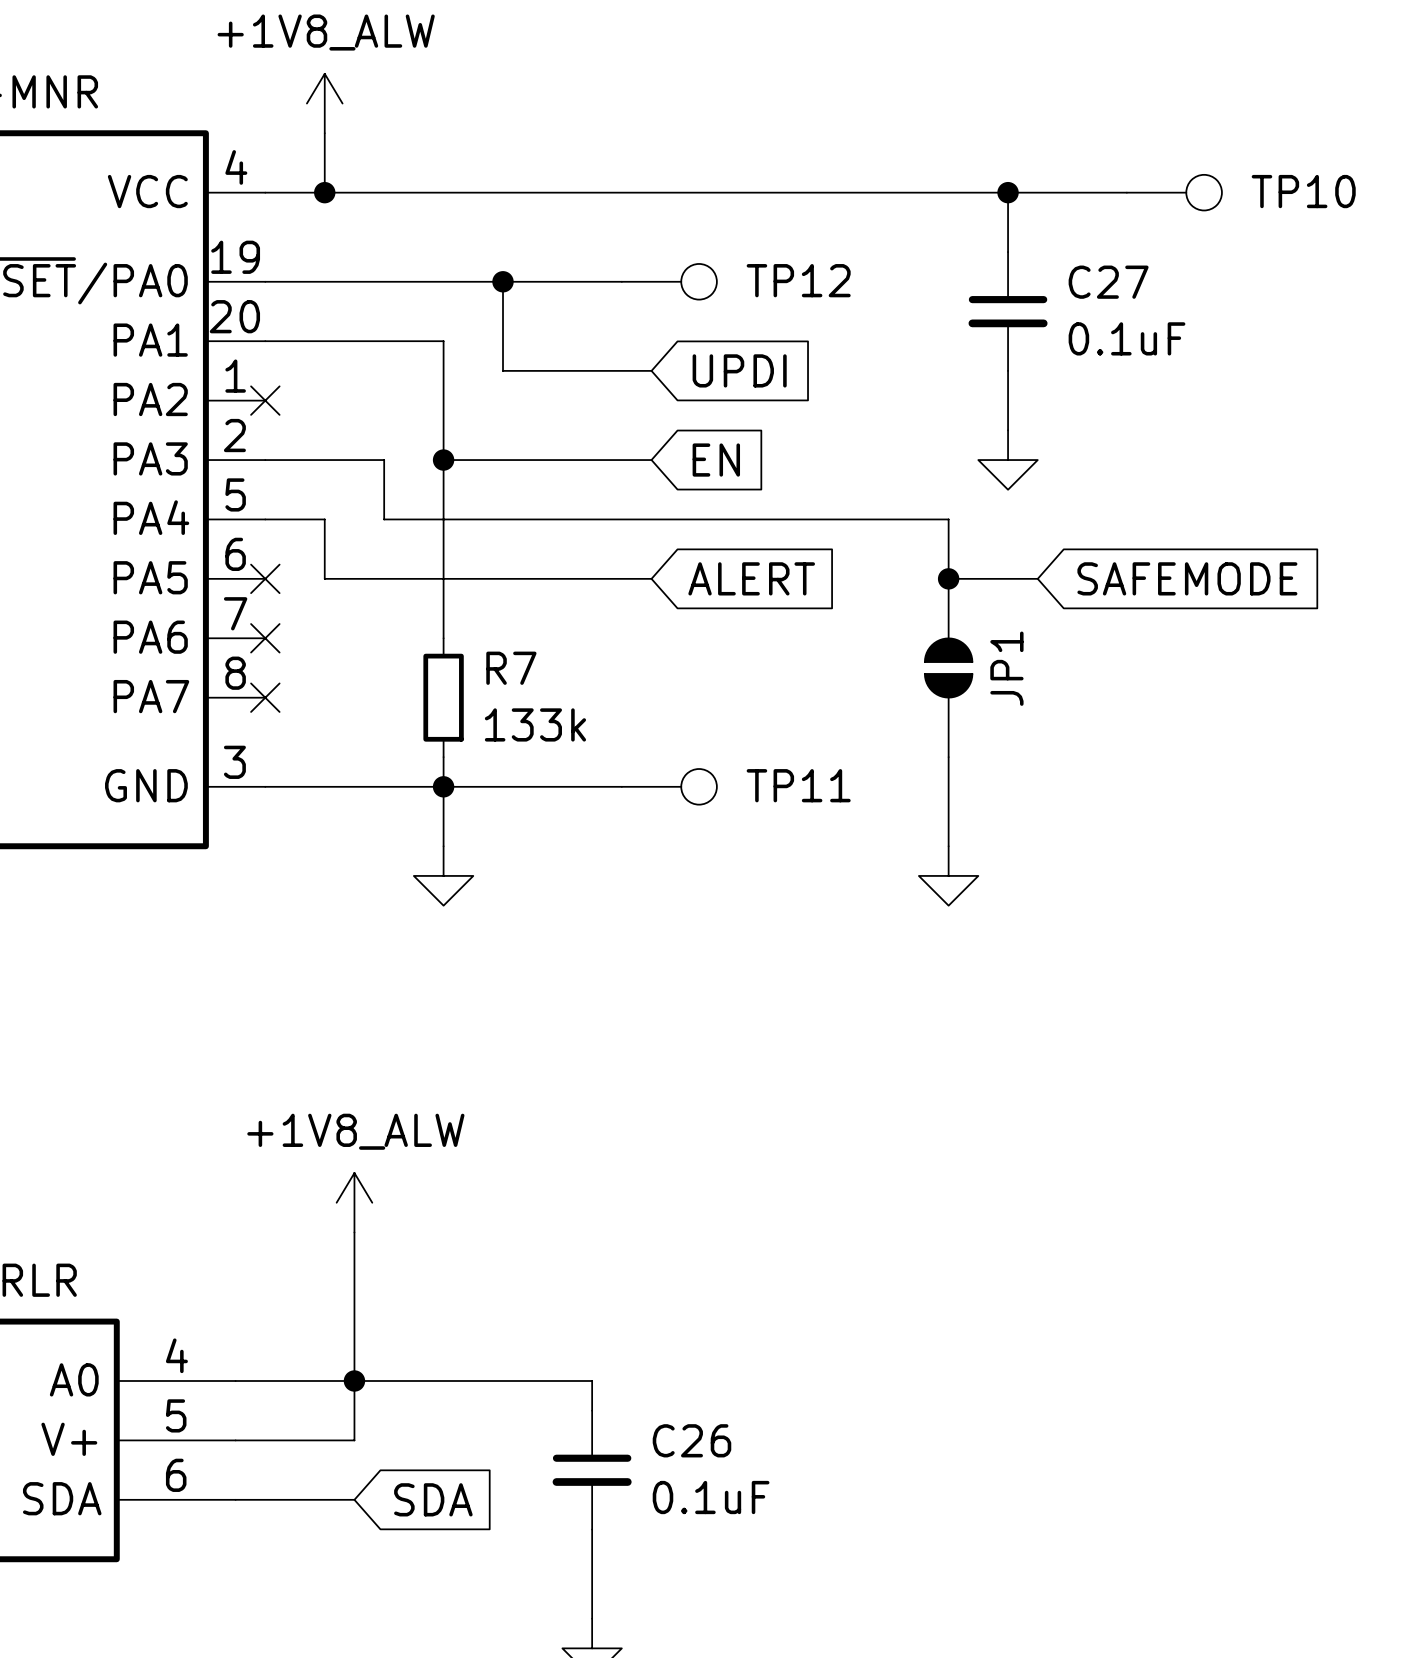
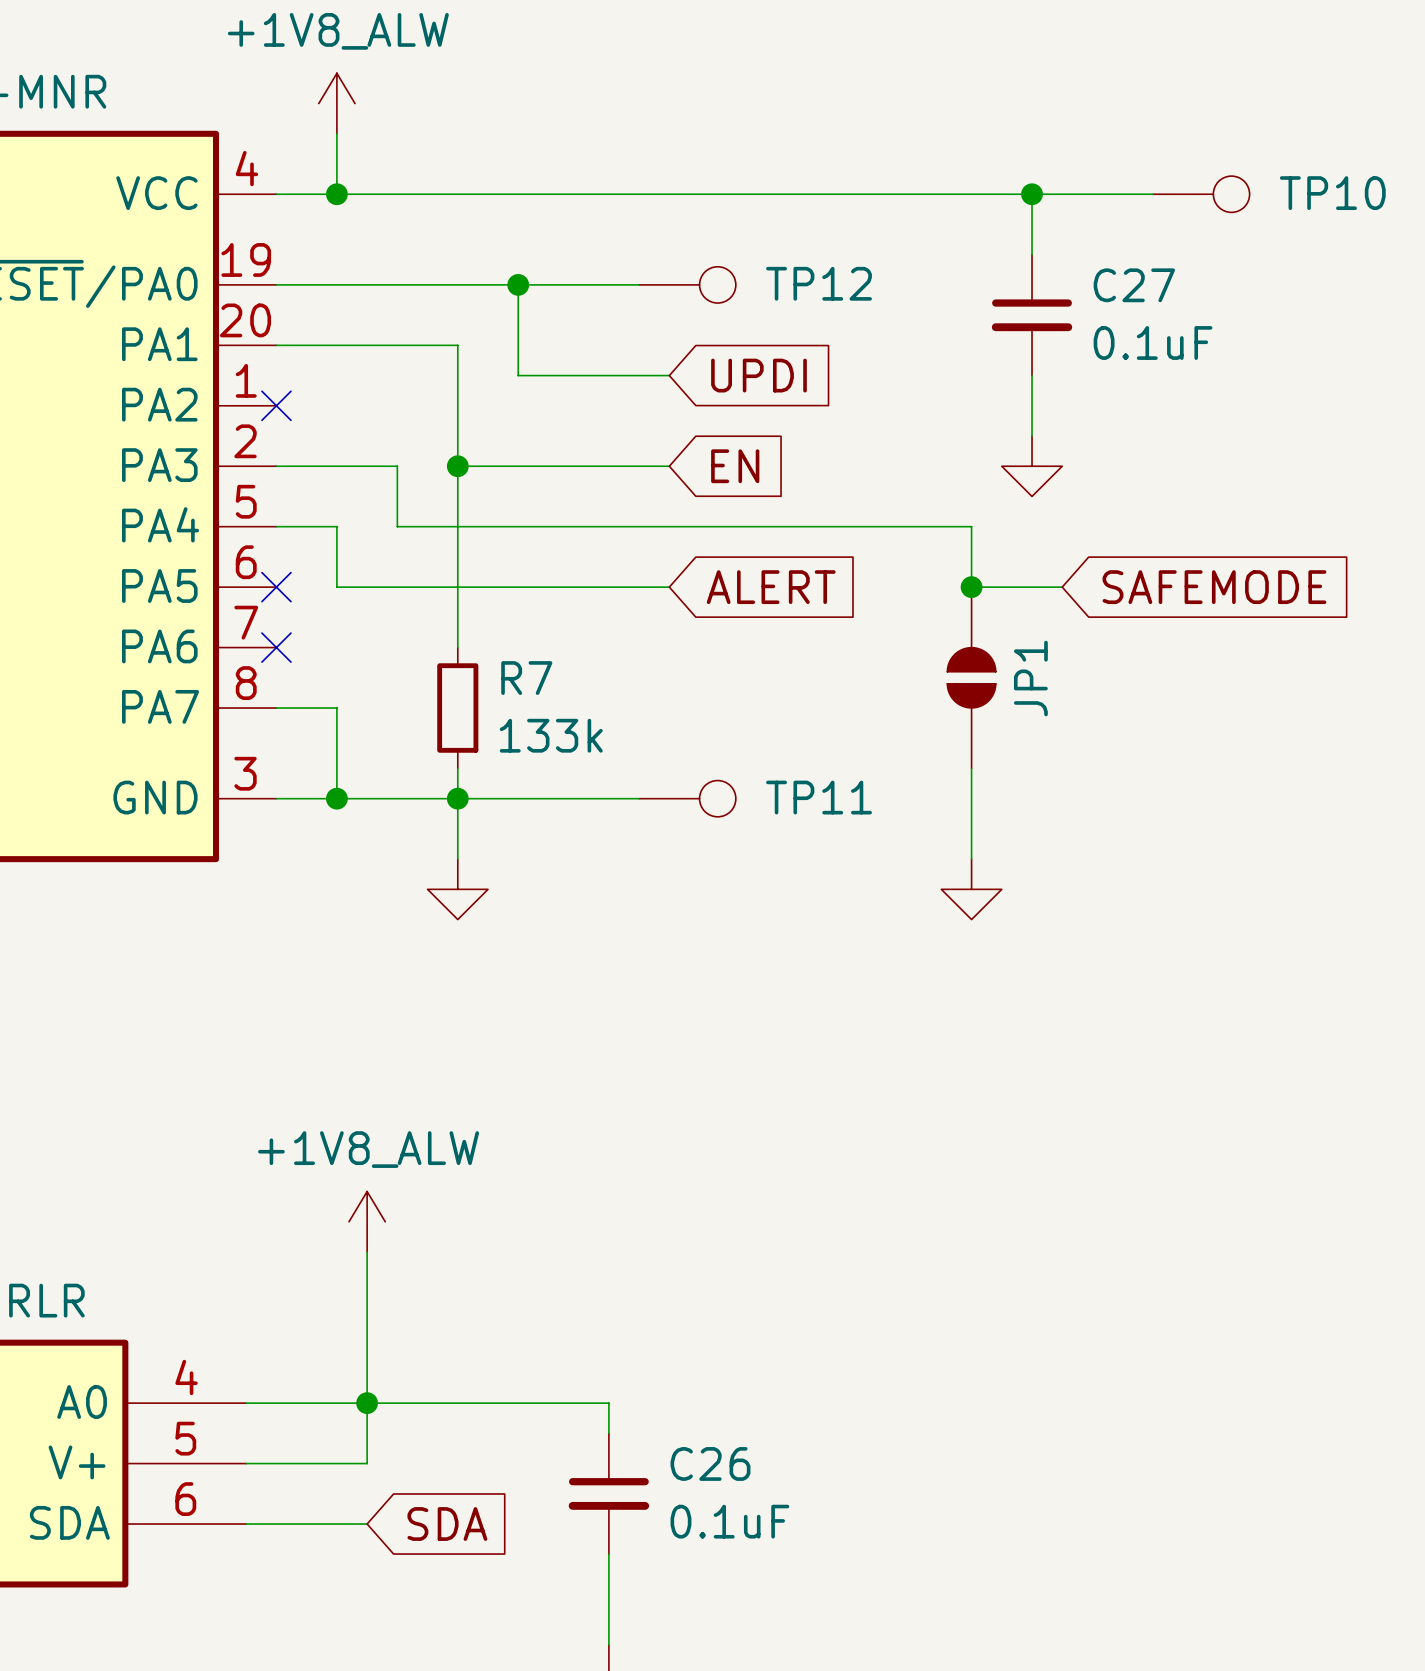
wire: none -> (276, 708) (336, 708) (336, 798)
no-connect mark: (265, 697) -> none
junction: none -> (336, 798)

